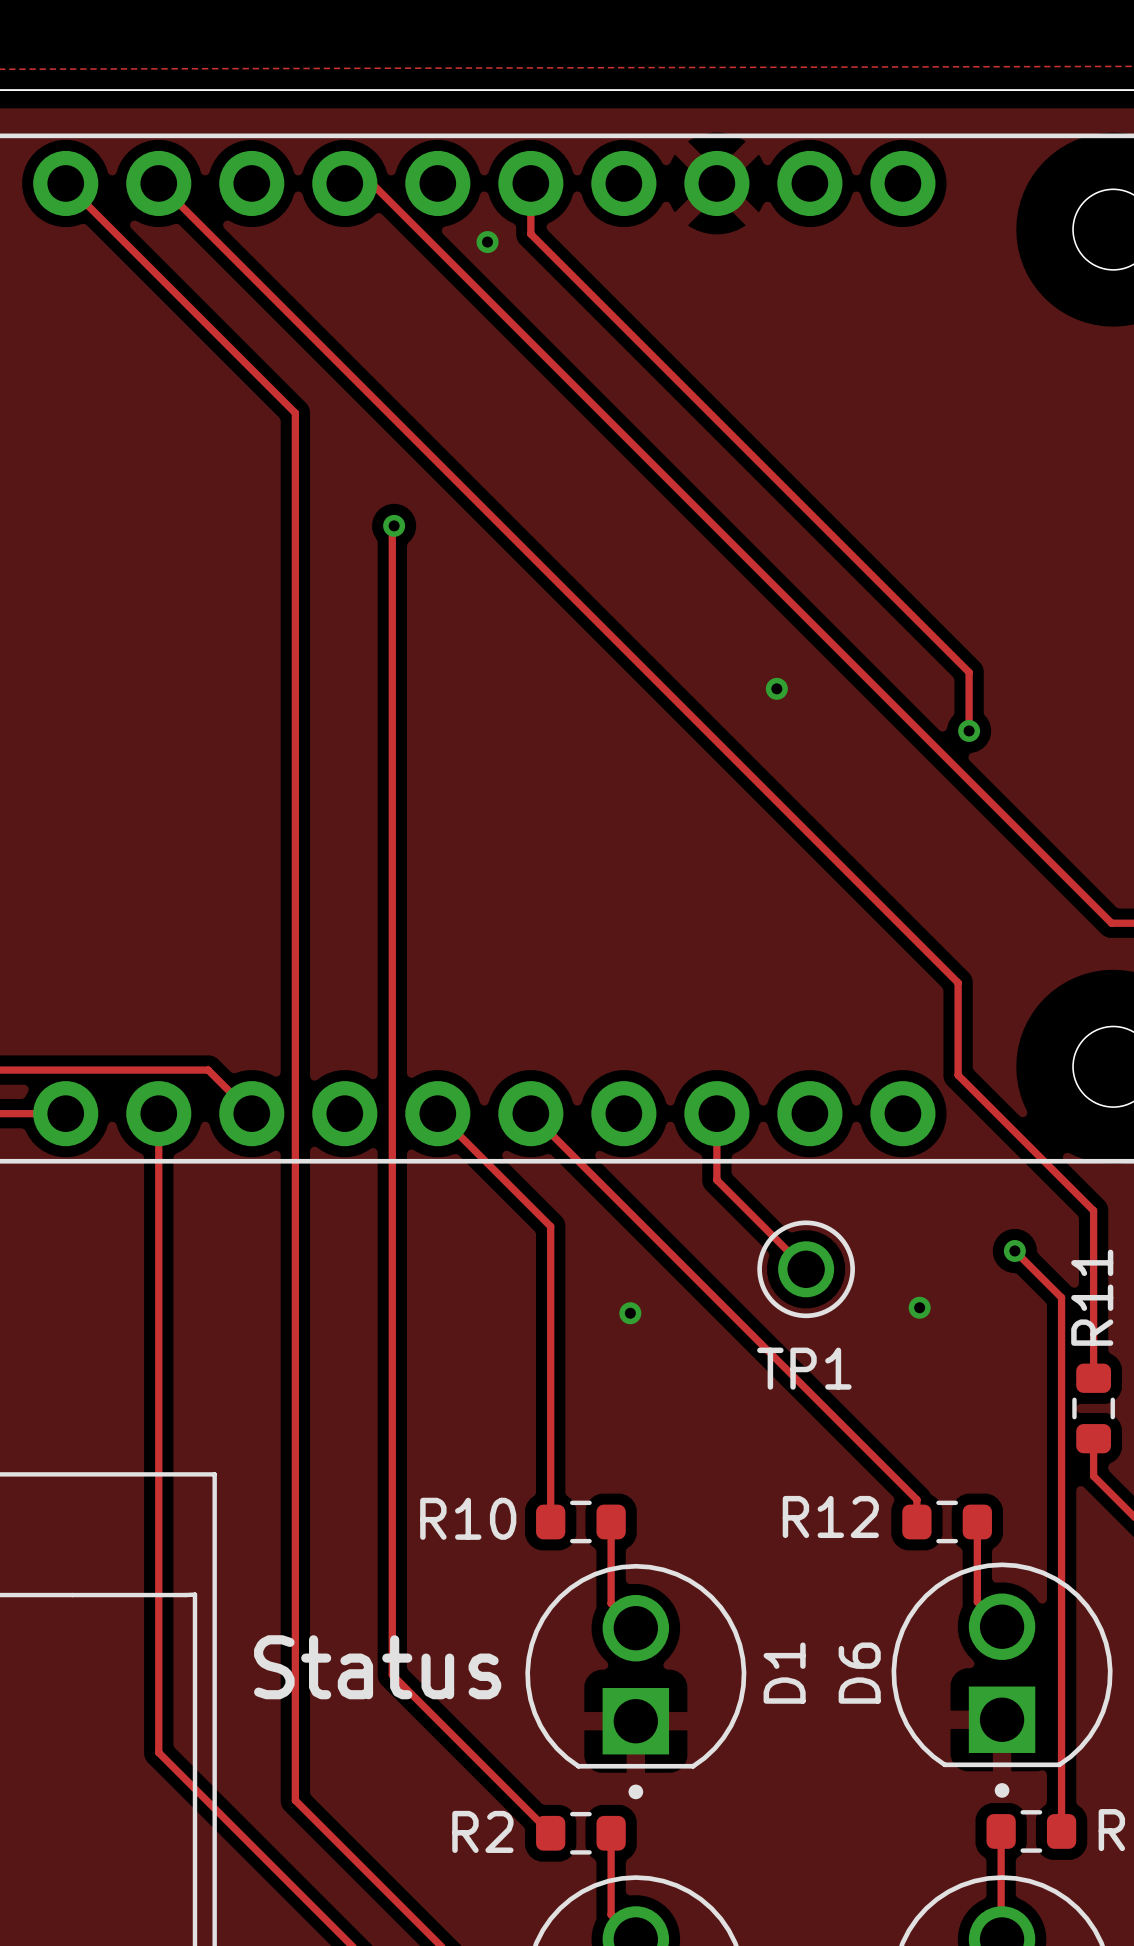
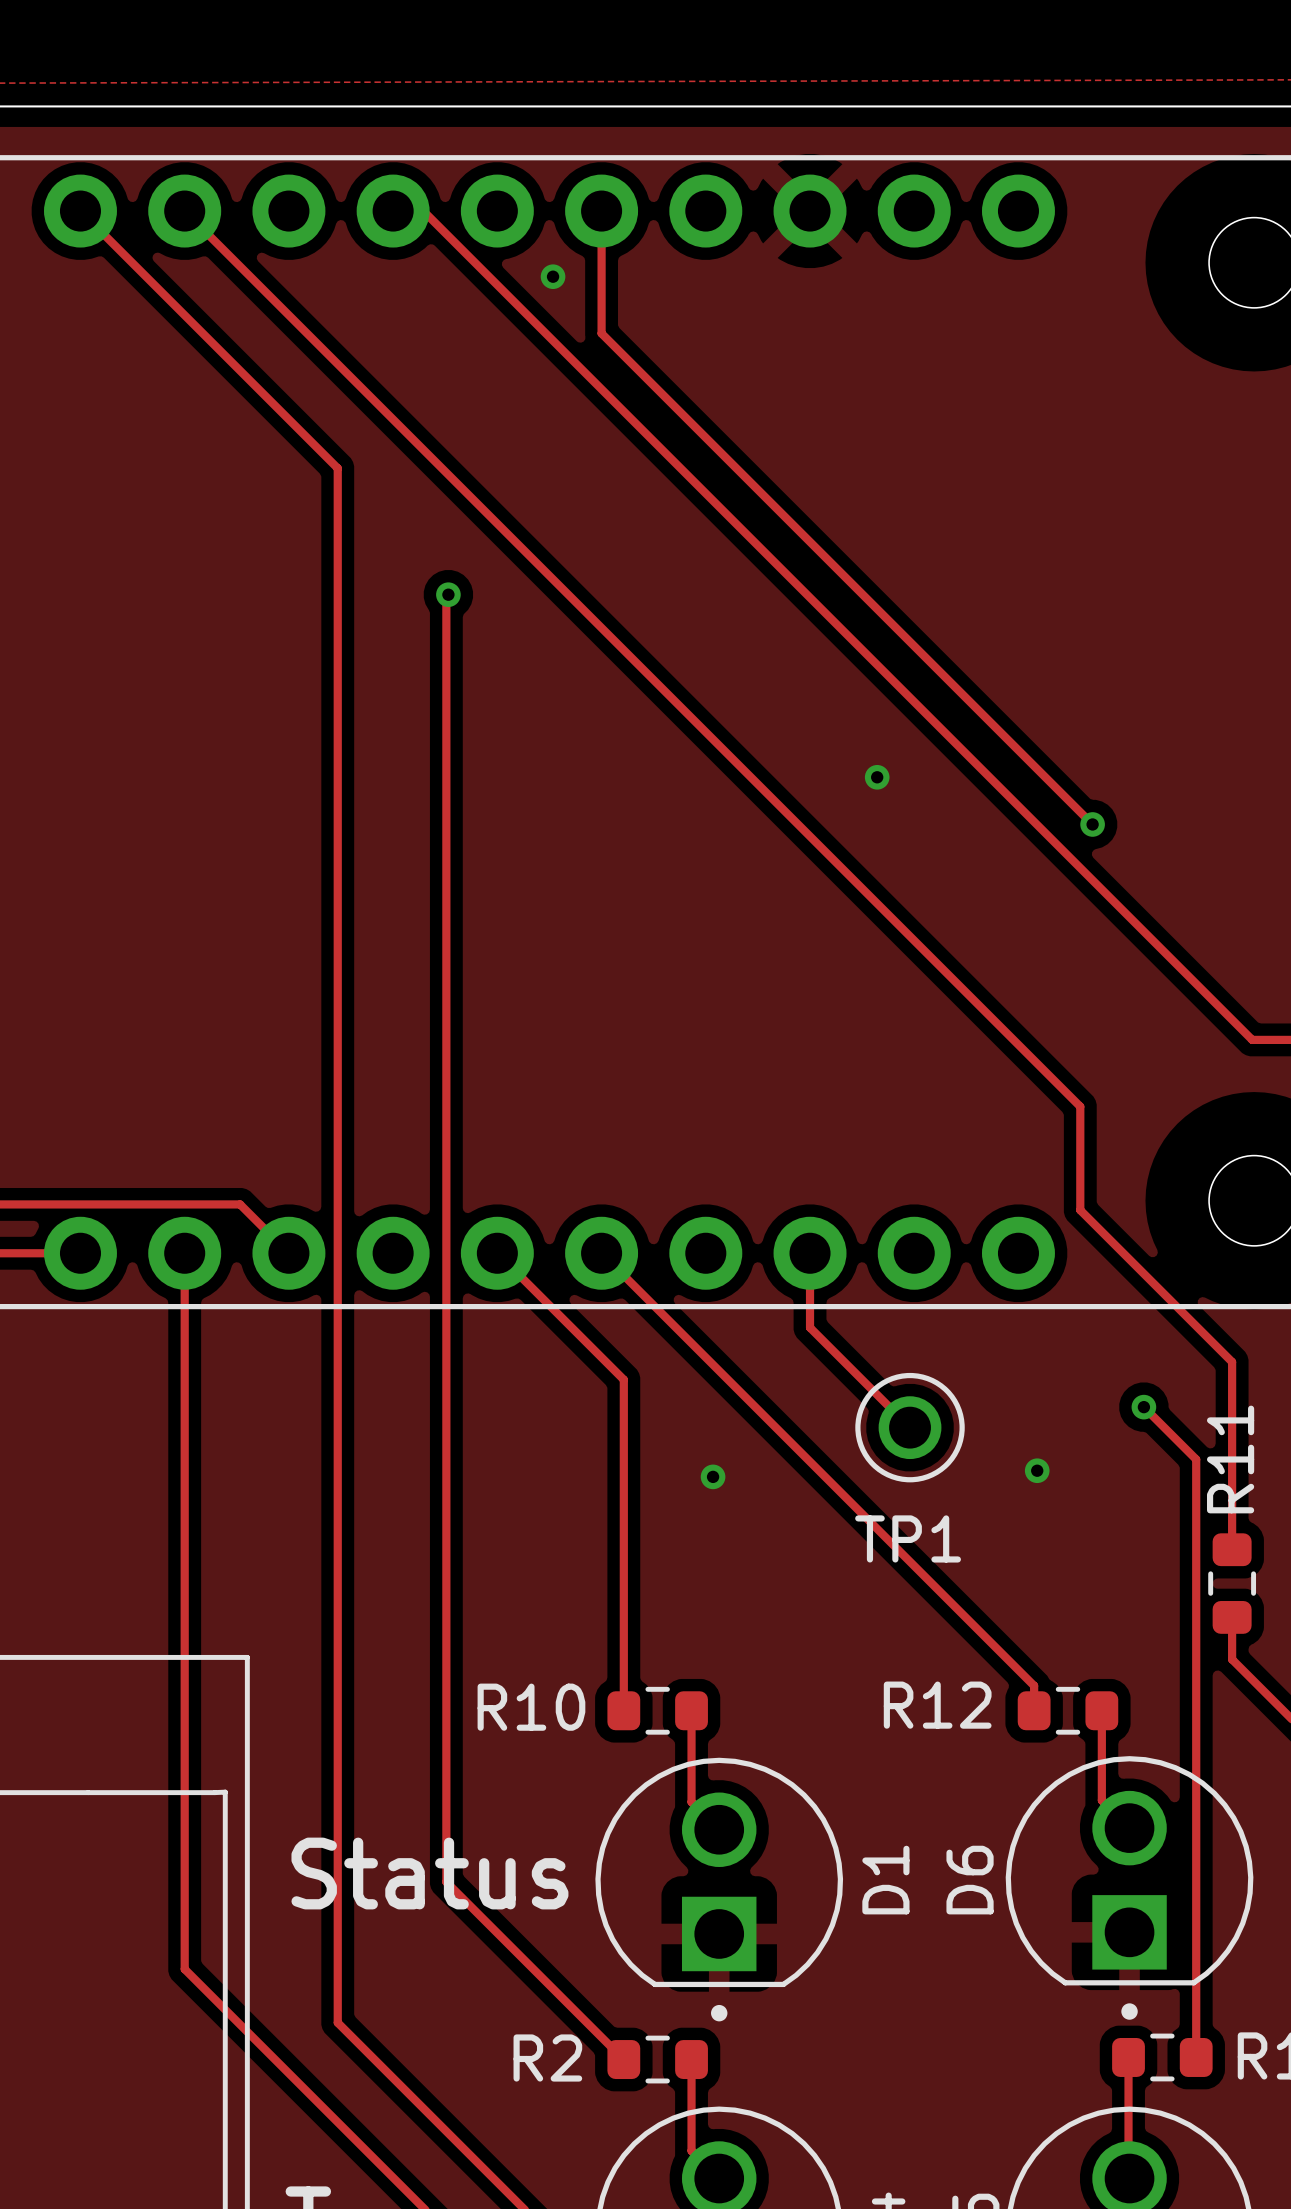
track: (530, 234) (969, 672) (969, 730) -> (601, 267) (601, 333) (1092, 824)

